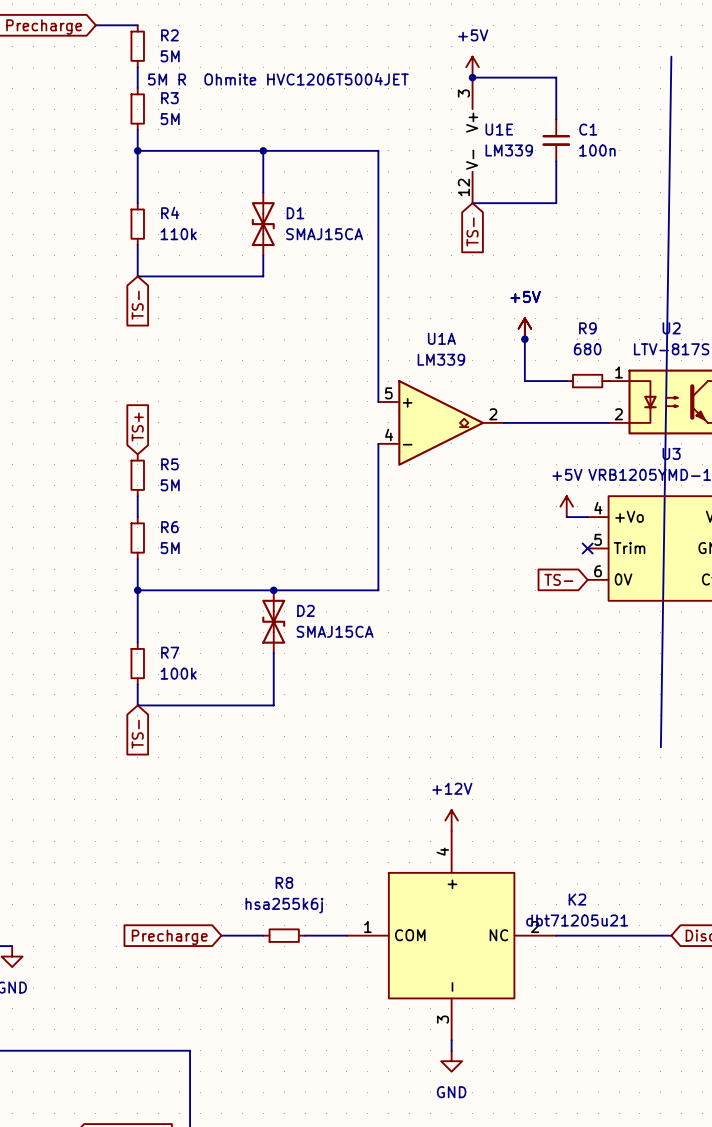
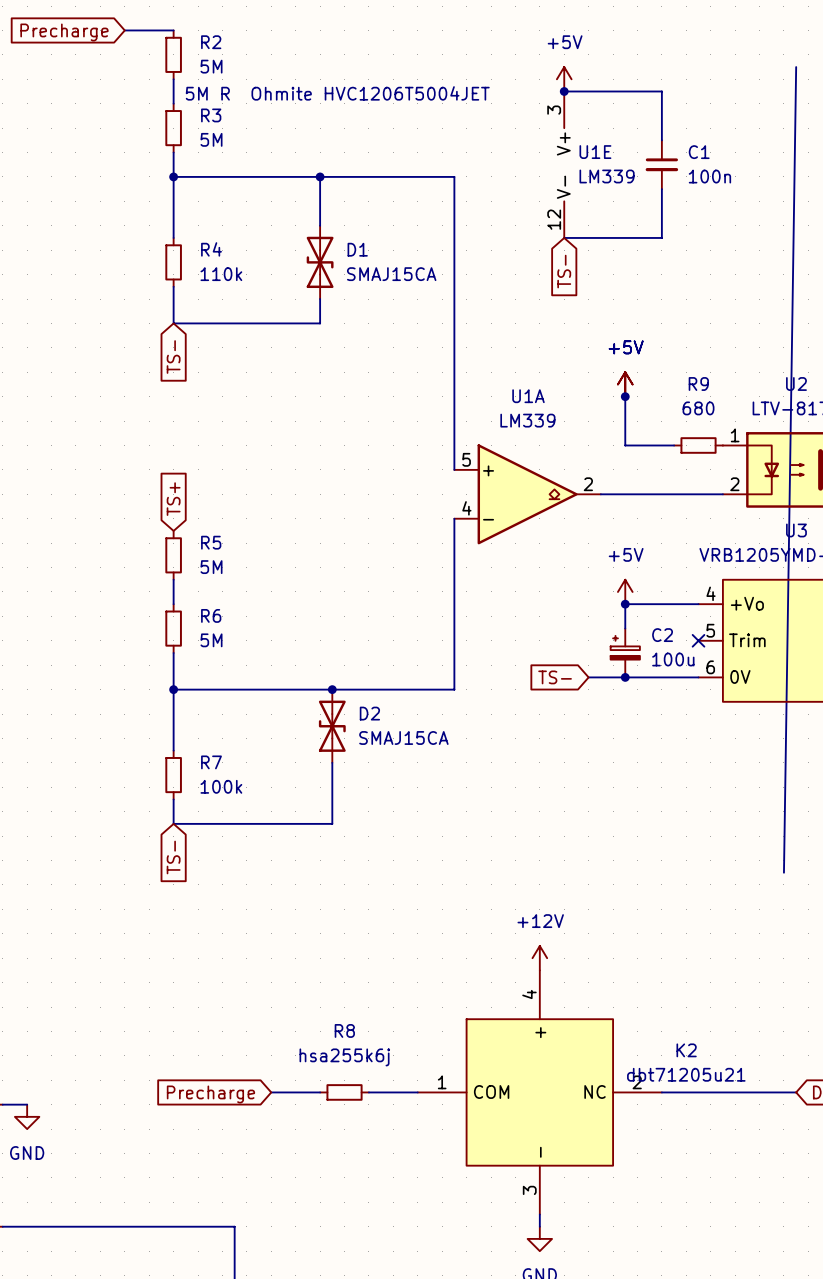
power symbol position: +5V (566, 506) -> +5V (625, 591)
junction: none -> (625, 604)
wire: none -> (674, 604) (625, 604) (625, 628)
C2: none -> 100u (625, 653)
wire: none -> (588, 677) (698, 677)
junction: none -> (625, 677)
global label position: TS- (558, 579) -> TS- (555, 677)

